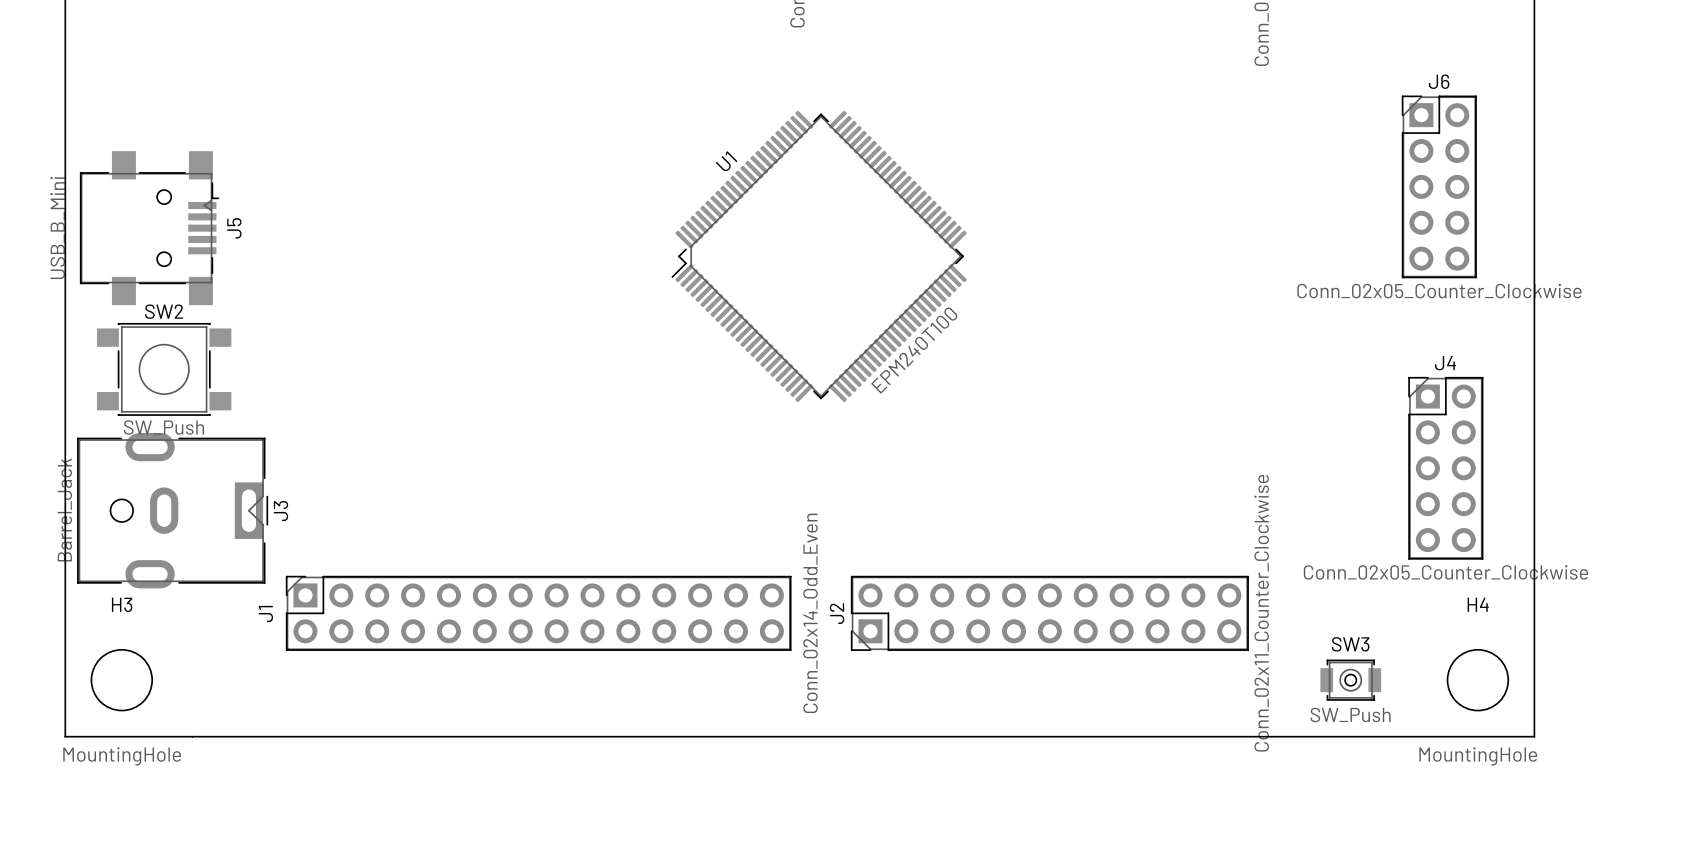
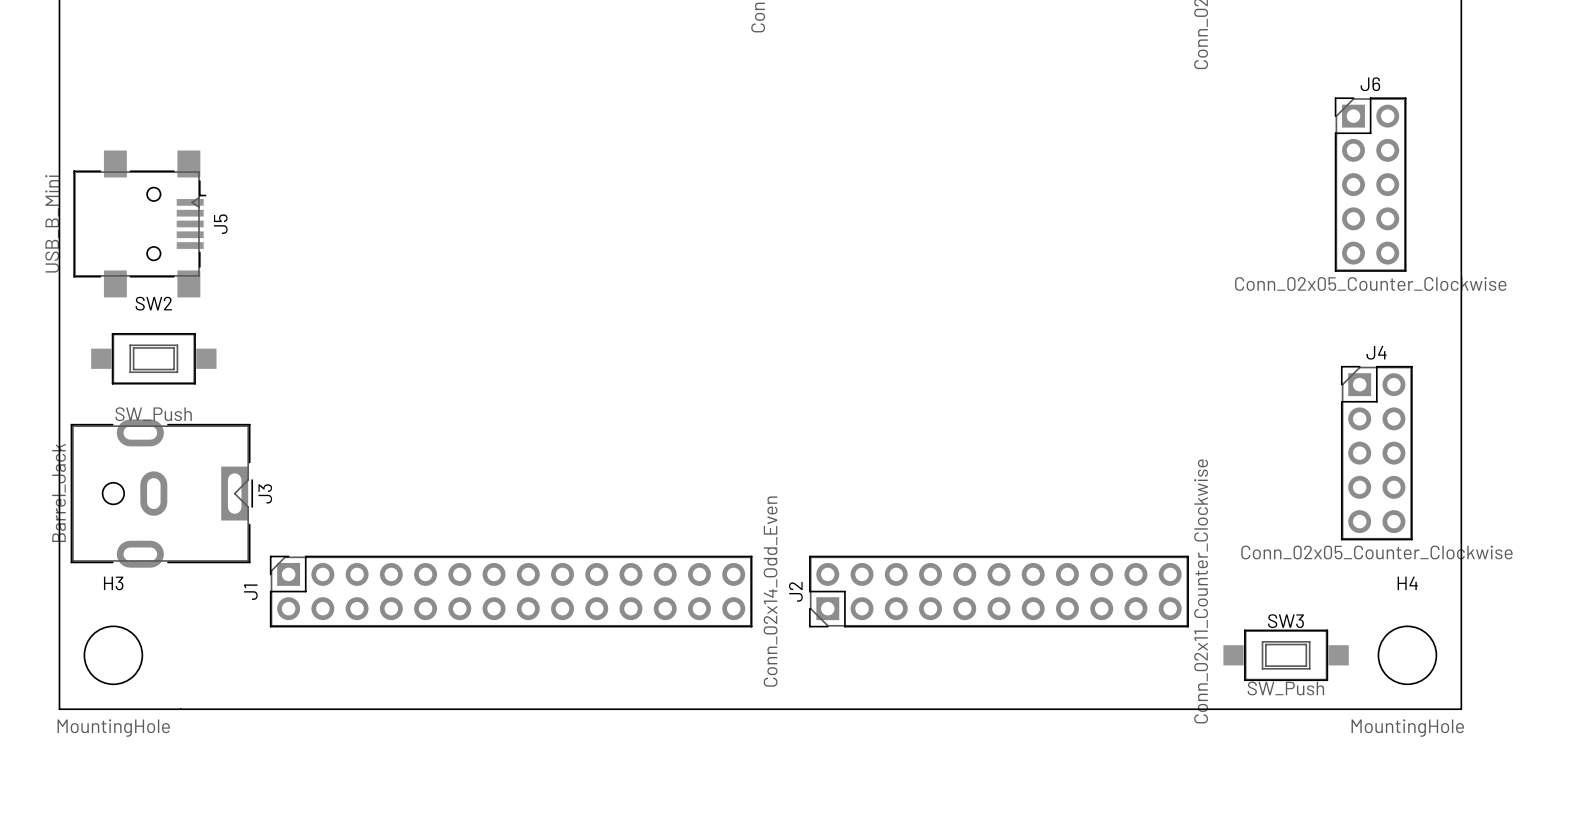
U1: EPM240T100 (819, 256) -> none
SW2 footprint: [97, 322, 232, 416] -> [91, 333, 217, 385]
SW3 footprint: [1320, 659, 1382, 701] -> [1223, 629, 1349, 682]

